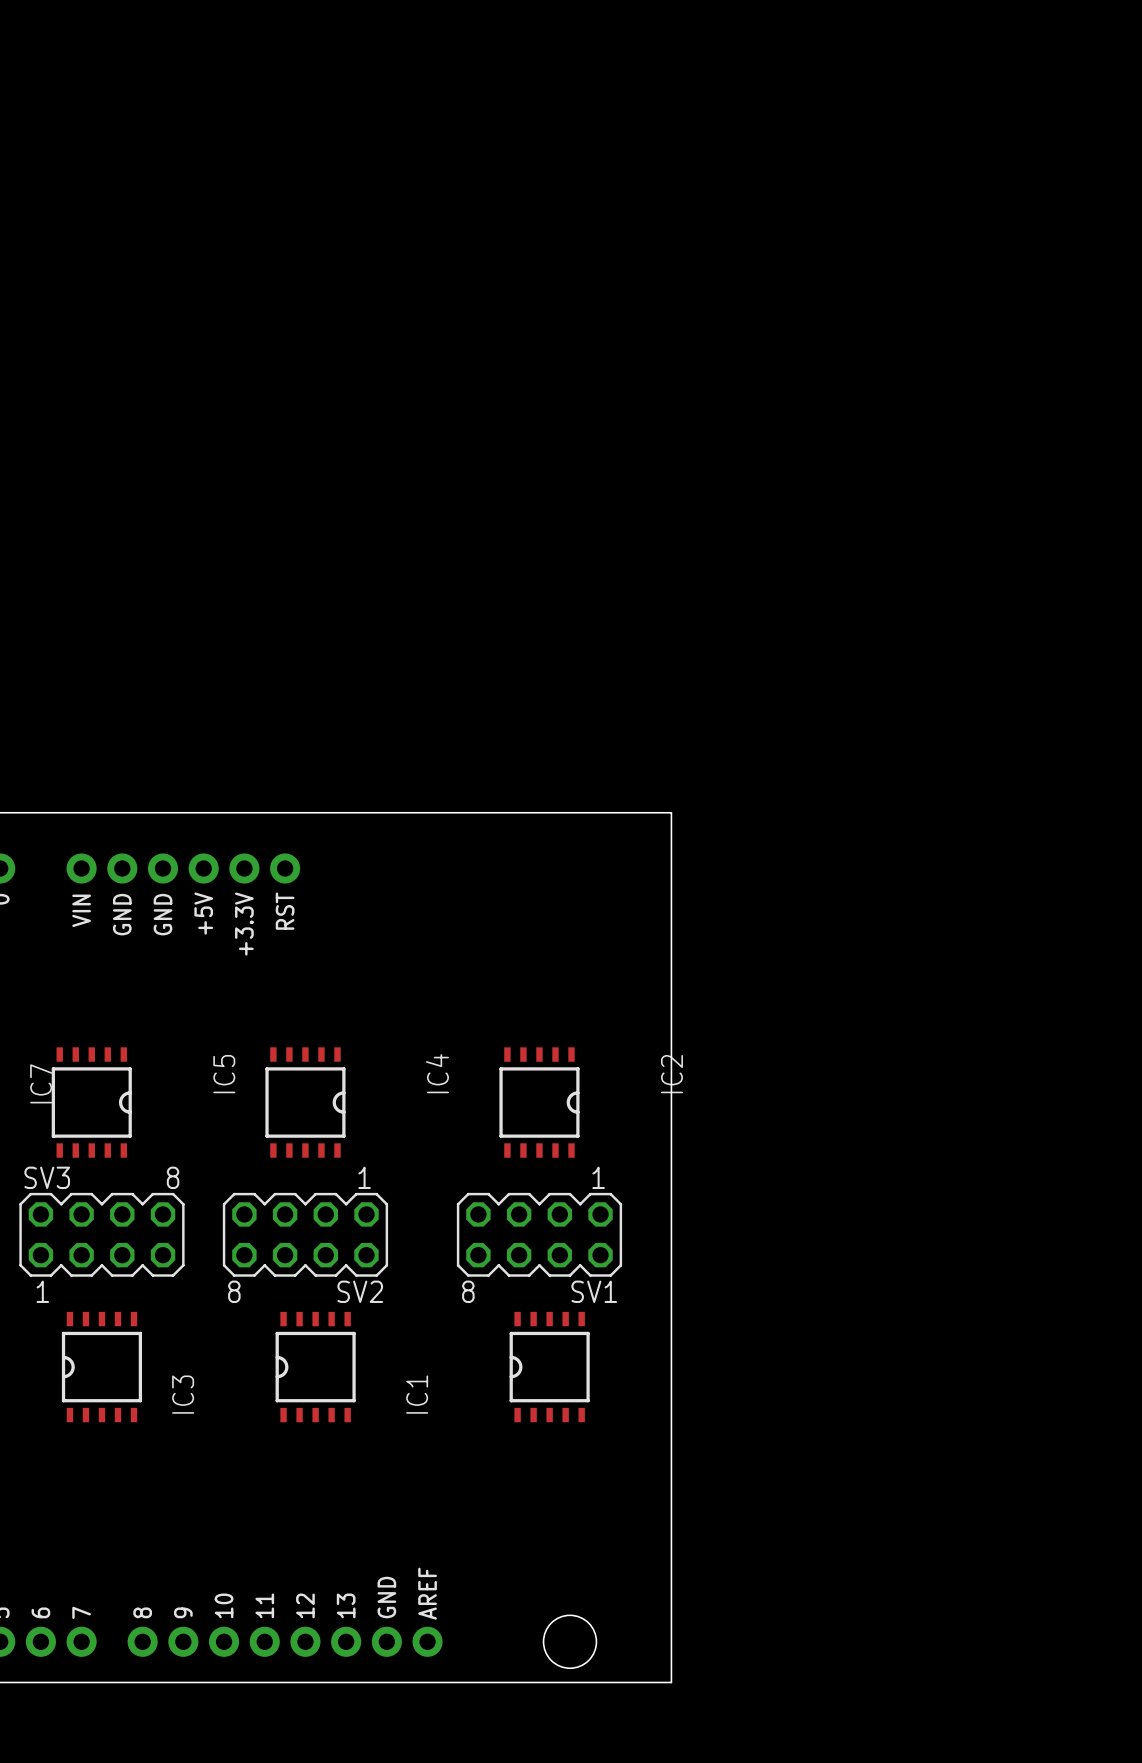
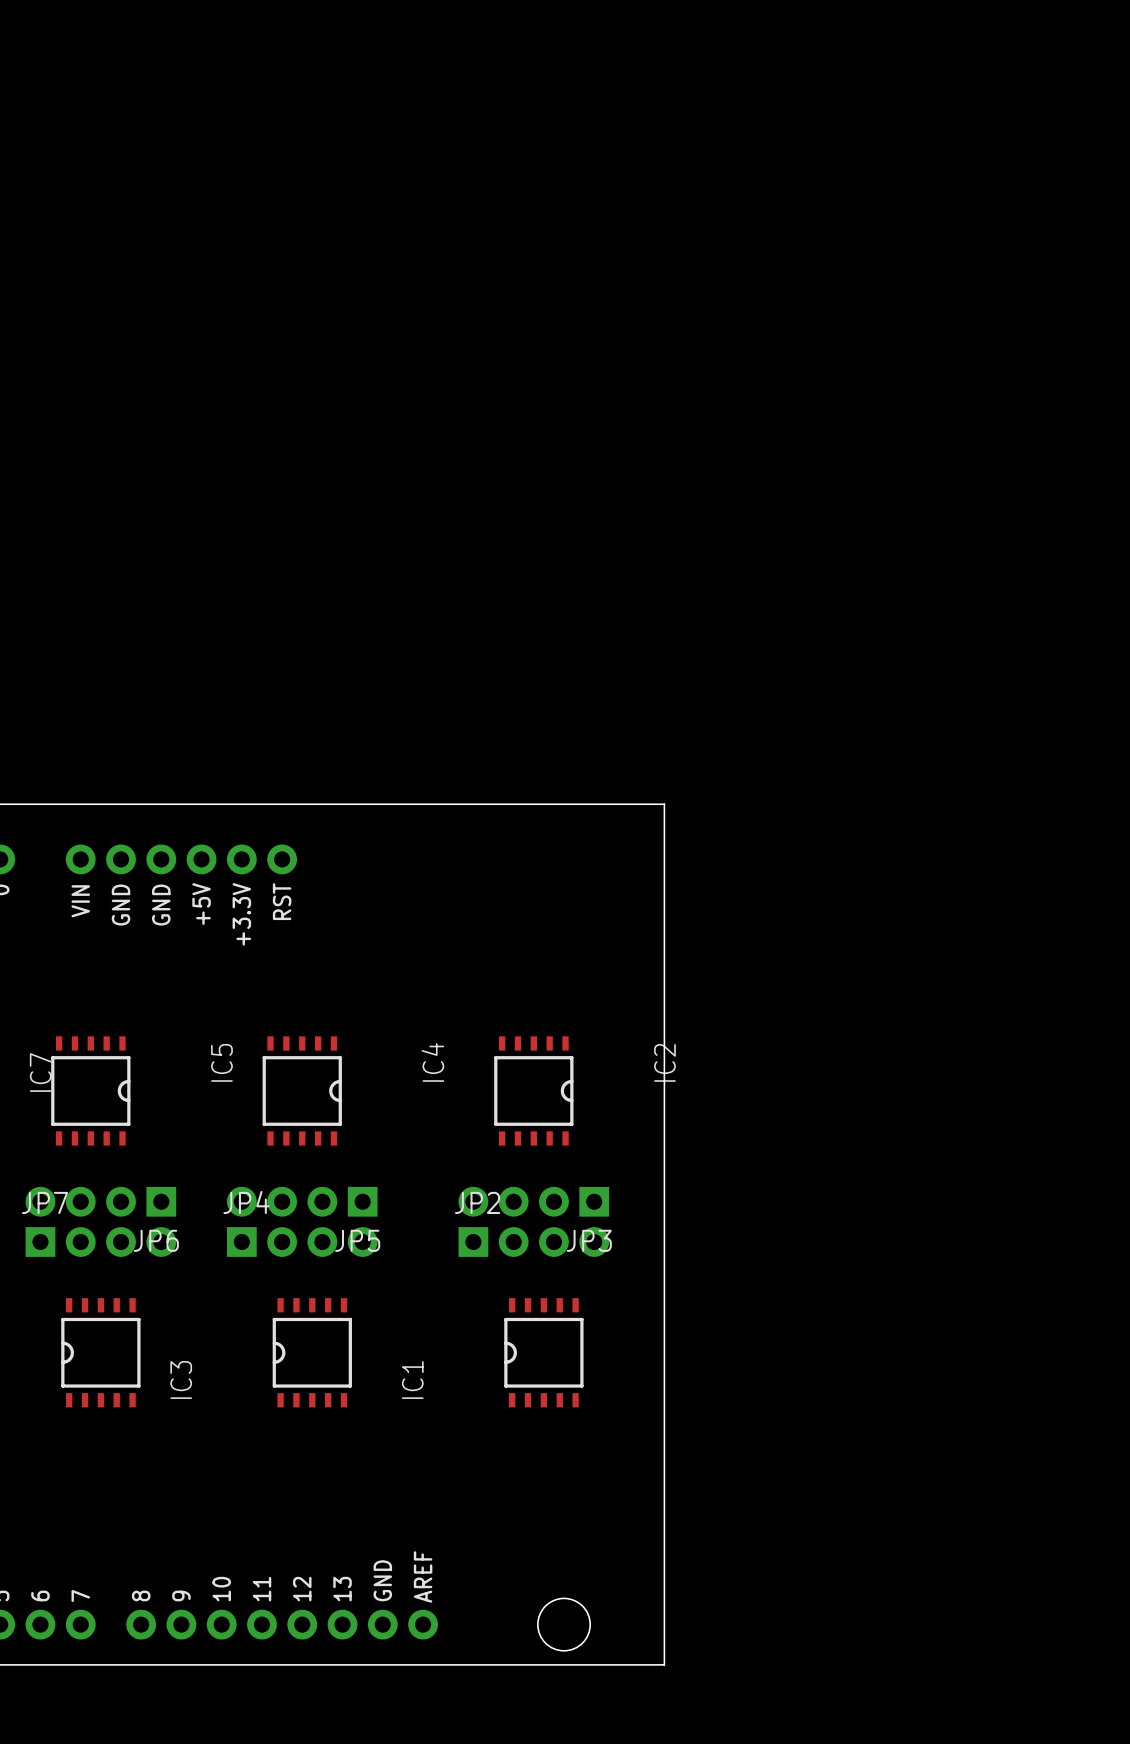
JP6: none -> (100, 1201)
JP5: none -> (302, 1201)
JP3: none -> (533, 1201)
SV3: (101, 1234) -> none
SV2: (305, 1234) -> none
SV1: (539, 1234) -> none
JP7: none -> (100, 1242)
JP4: none -> (302, 1242)
JP2: none -> (533, 1242)

